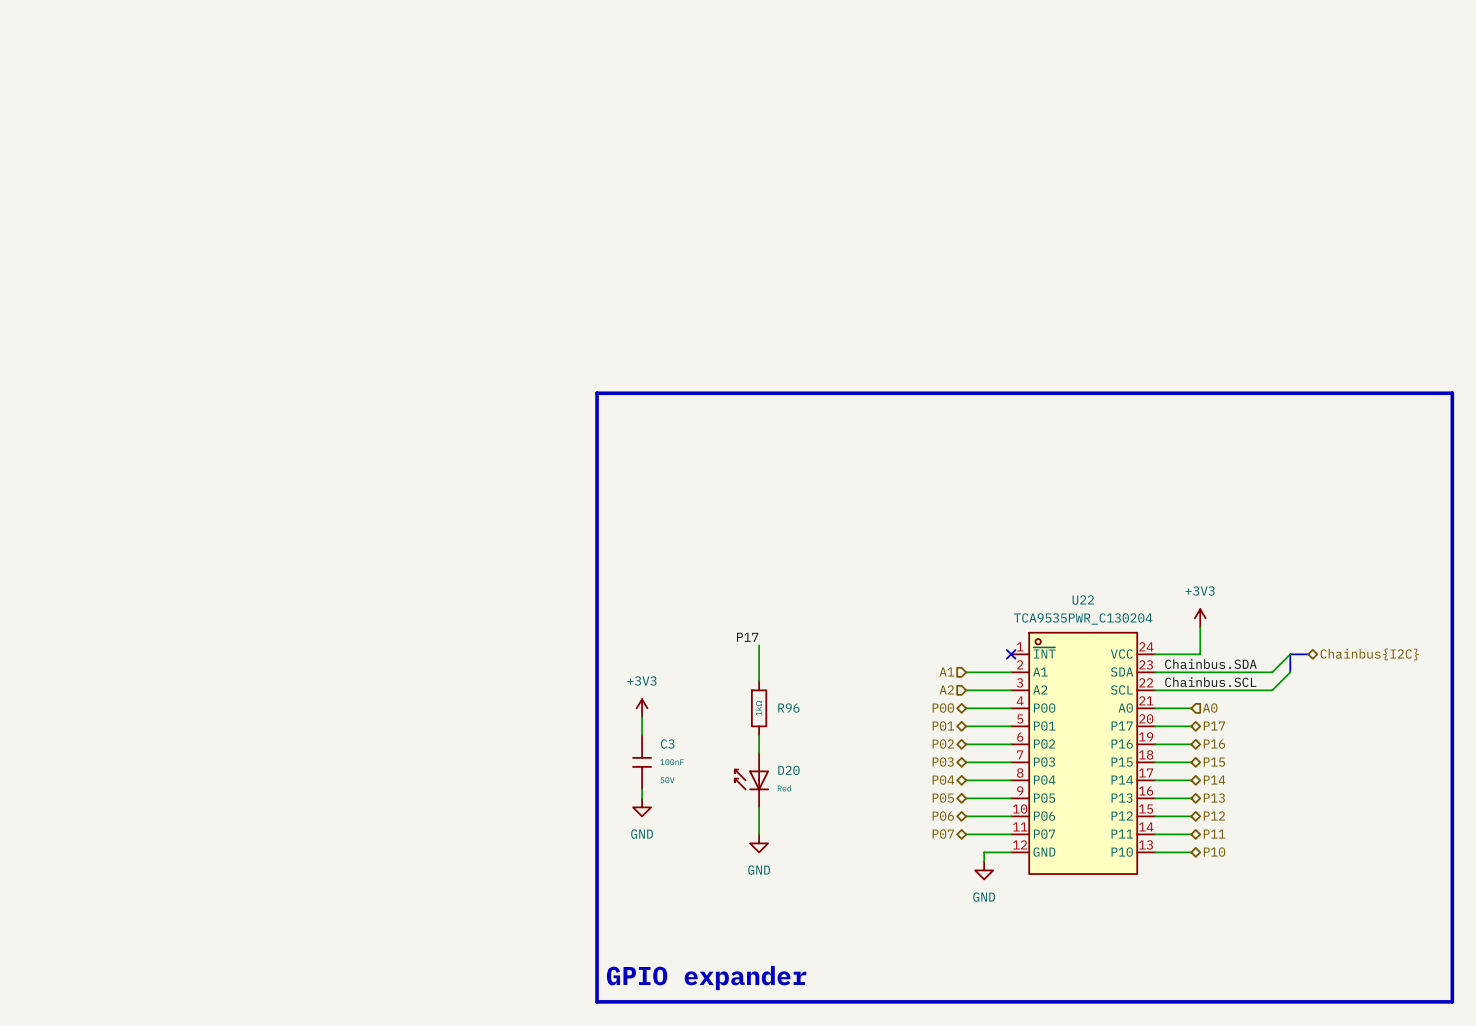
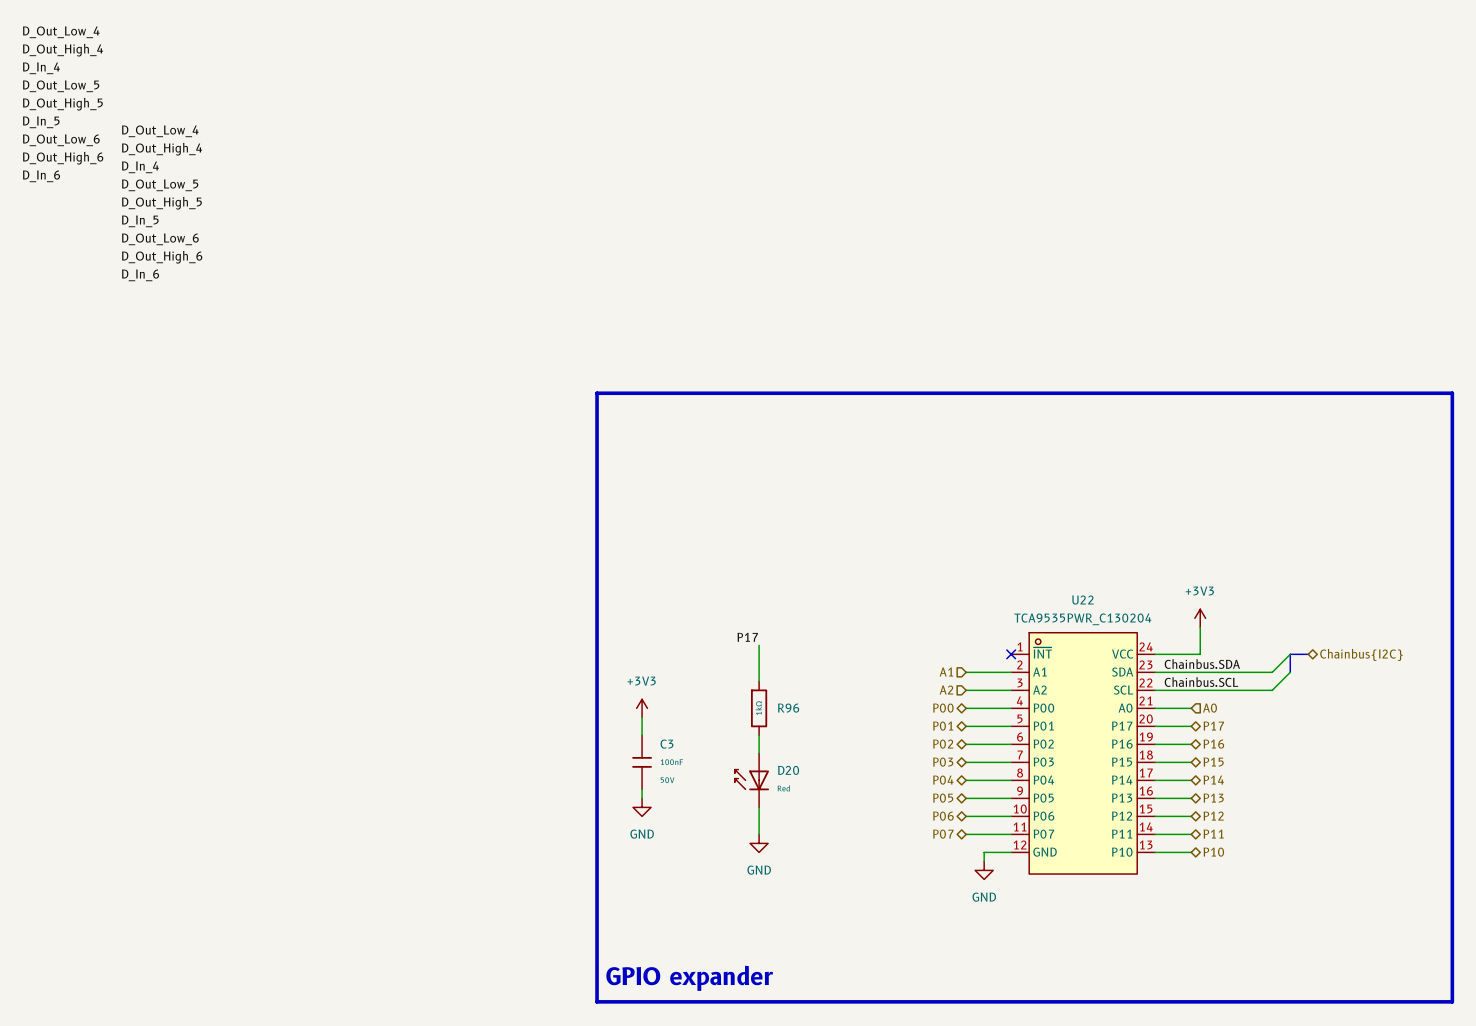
label: none -> D_Out_Low_4 (61, 32)
label: none -> D_Out_High_4 (63, 50)
label: none -> D_In_4 (41, 68)
label: none -> D_Out_Low_5 (61, 86)
label: none -> D_Out_High_5 (62, 104)
label: none -> D_In_5 (41, 122)
label: none -> D_Out_Low_4 (160, 131)
label: none -> D_Out_Low_6 (61, 140)
label: none -> D_Out_High_4 (162, 149)
label: none -> D_Out_High_6 (63, 158)
label: none -> D_In_4 (140, 167)
label: none -> D_In_6 (41, 176)
label: none -> D_Out_Low_5 (160, 185)
label: none -> D_Out_High_5 (161, 203)
label: none -> D_In_5 (140, 221)
label: none -> D_Out_Low_6 (160, 239)
label: none -> D_Out_High_6 (162, 257)
label: none -> D_In_6 (140, 275)

